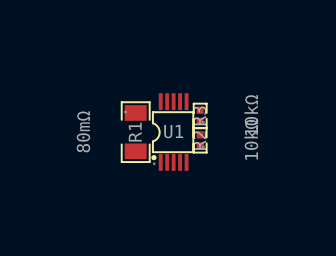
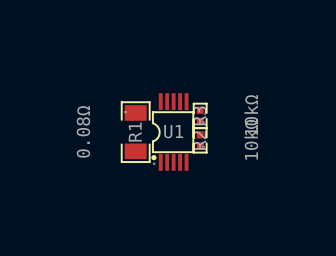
R1 value: 80mΩ (83, 131) -> 0.08Ω (83, 131)

